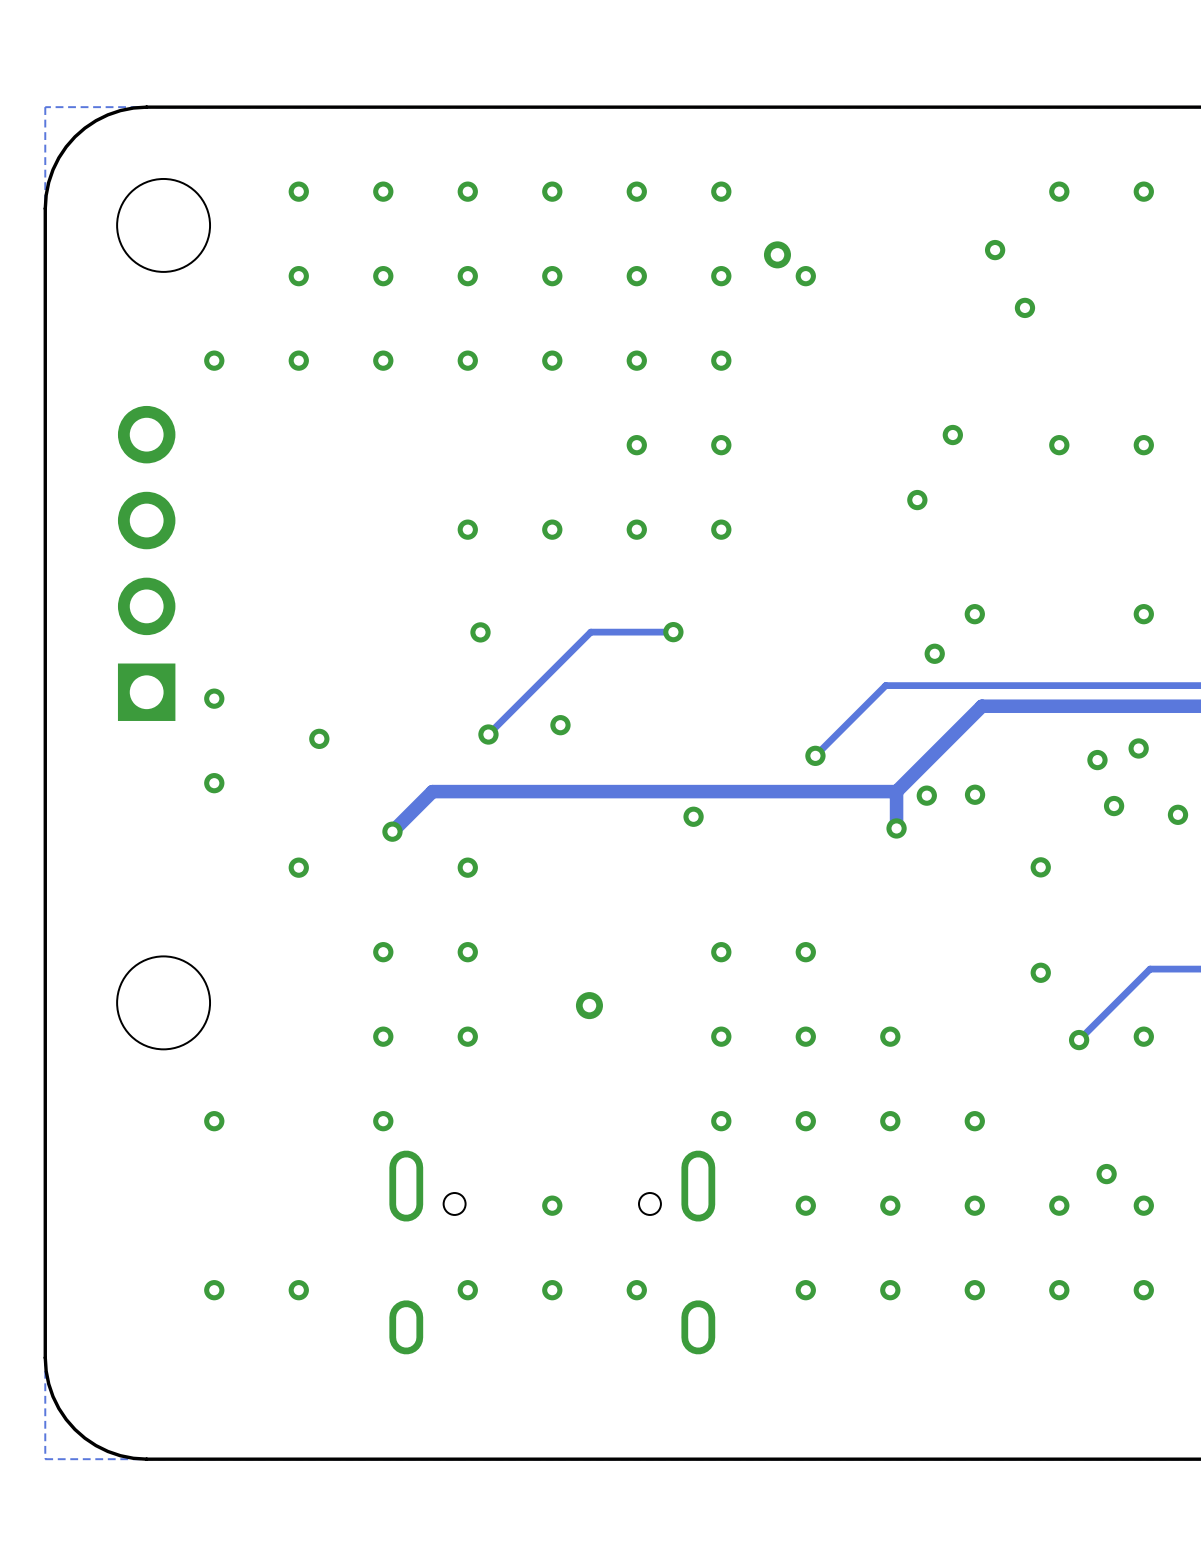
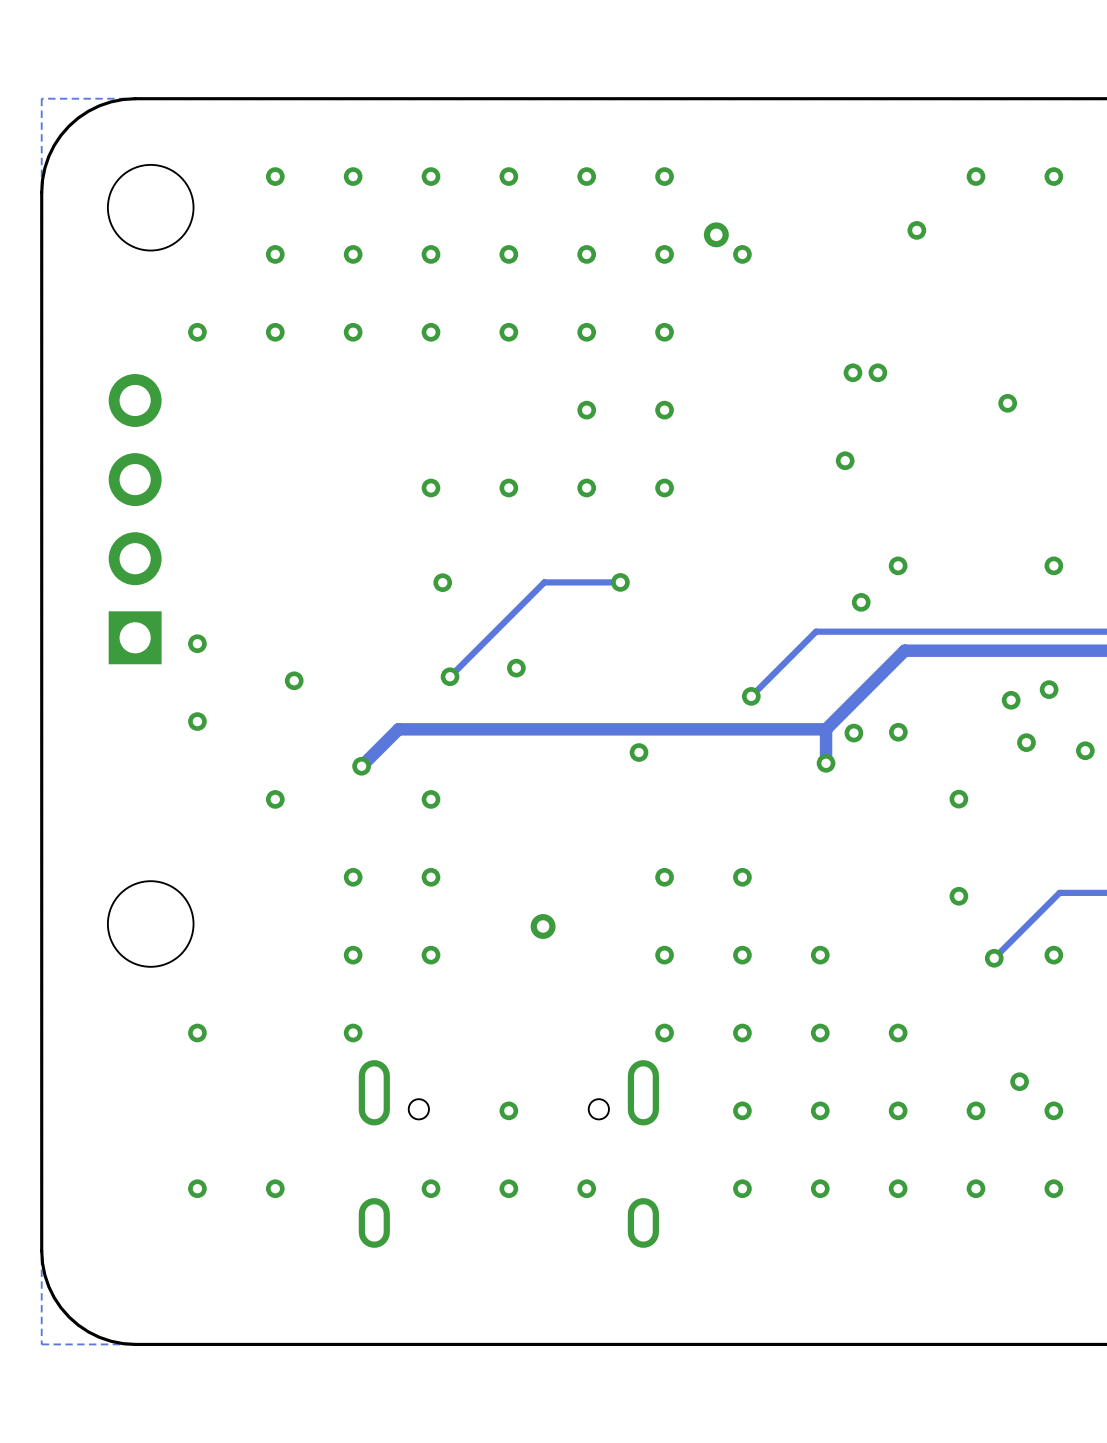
via: (1024, 307) -> none
via: none -> (852, 372)
via: none -> (877, 372)
via: (952, 435) -> none
via: none -> (1007, 403)
via: (1059, 445) -> none
via: (1143, 445) -> none

